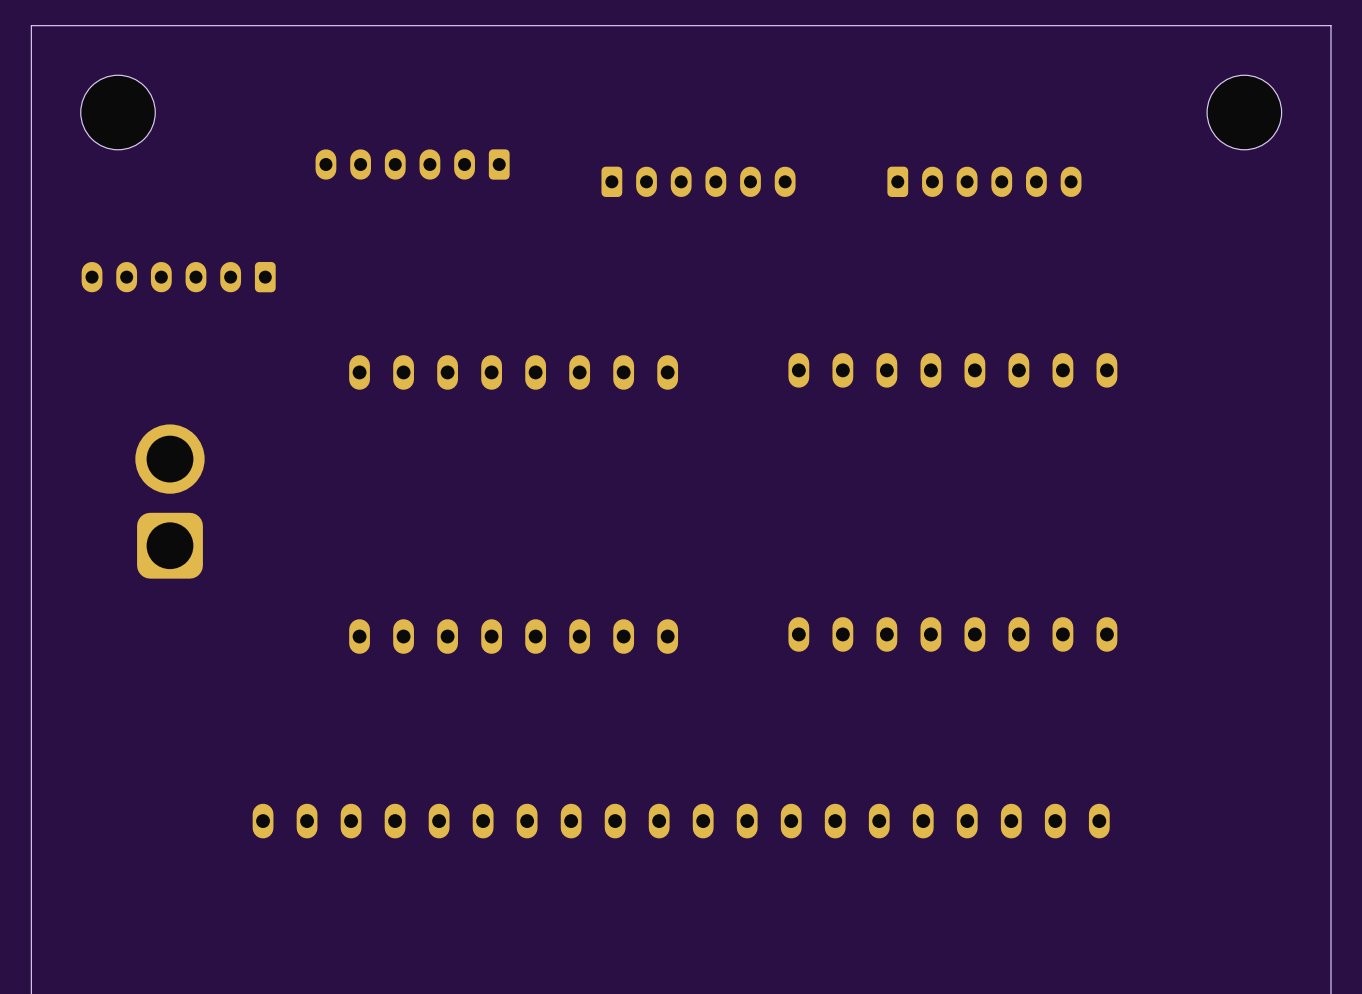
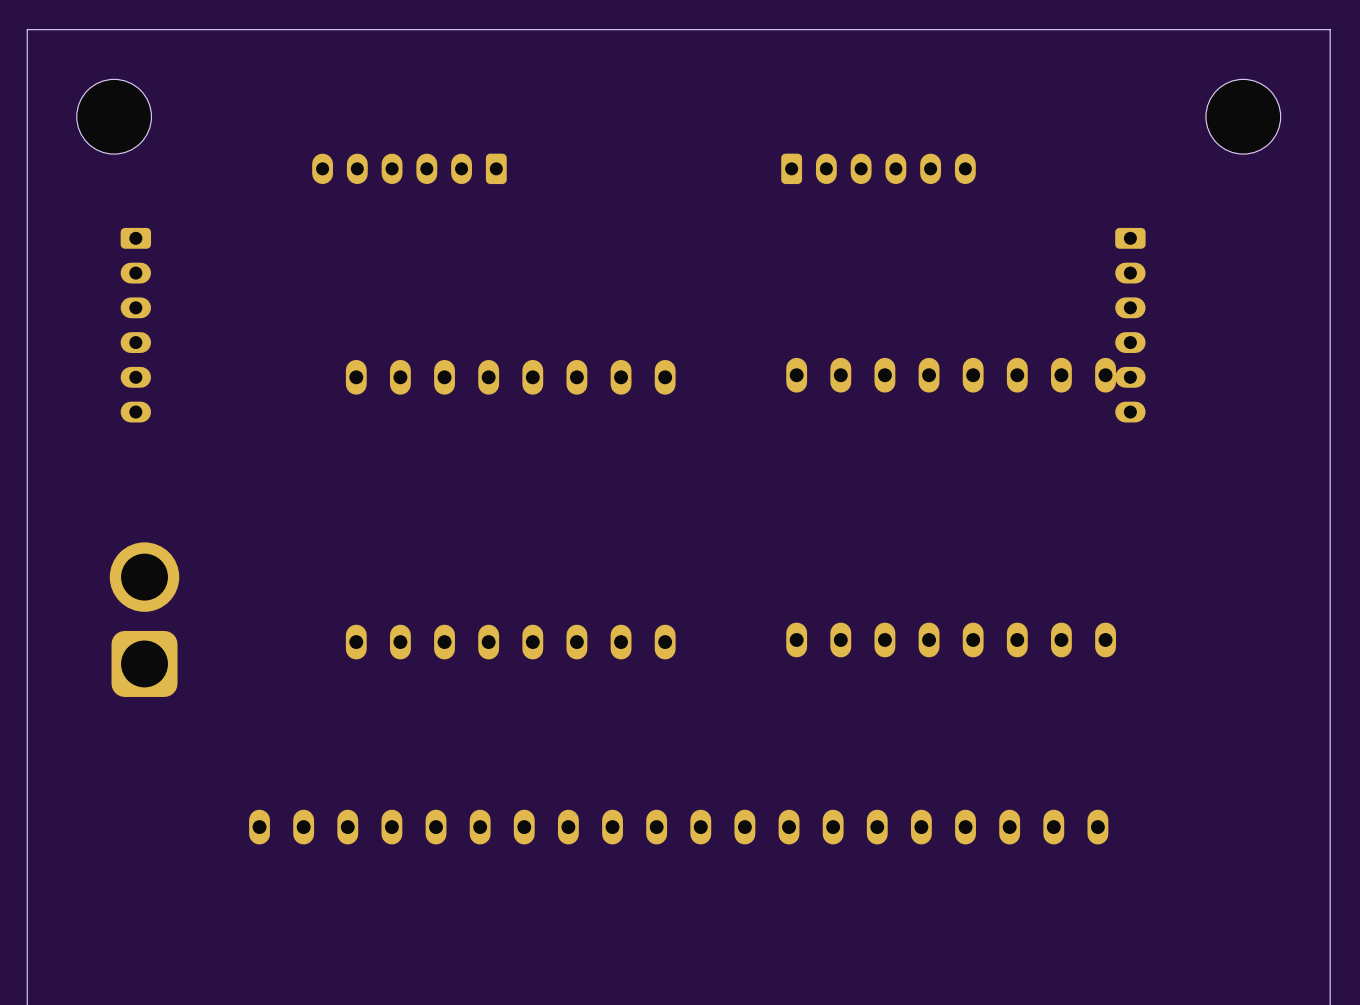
part: none -> (878, 168)
part: (698, 181) -> none
part: (984, 181) -> none
part rotation: 0° (178, 277) -> 90° counterclockwise (135, 325)
part: none -> (1130, 325)
part position: (169, 501) -> (144, 619)

